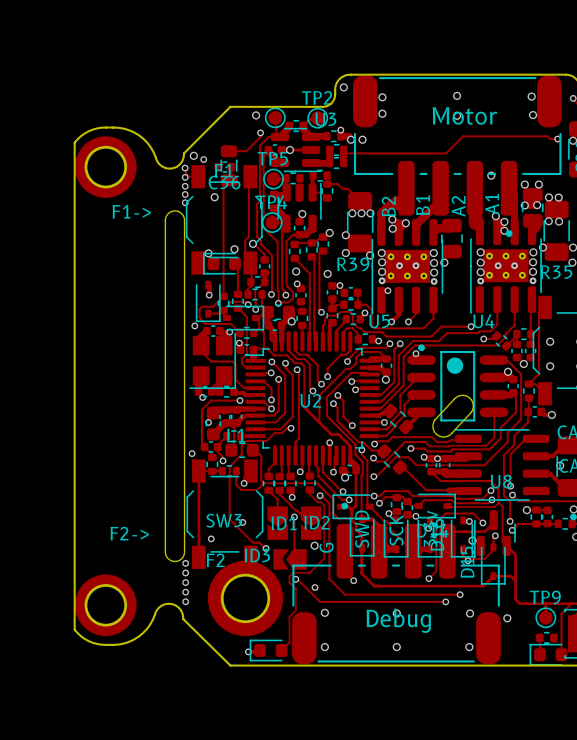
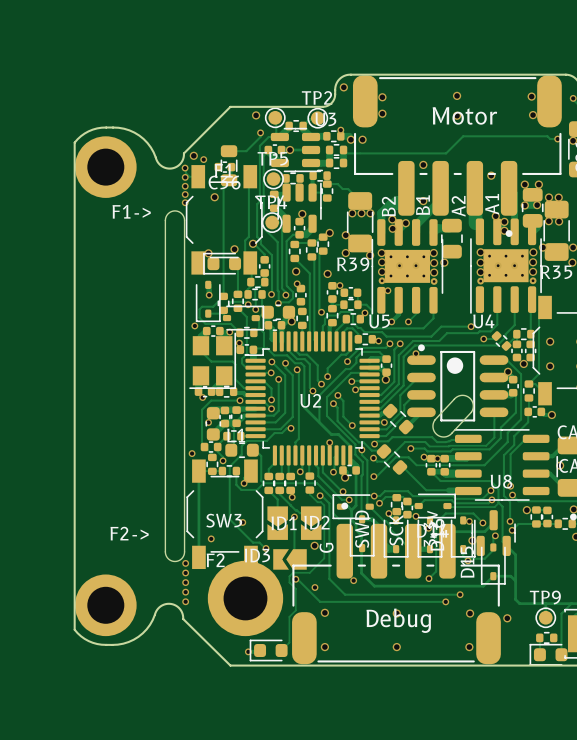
via: none -> (423, 164)
via: none -> (423, 201)

